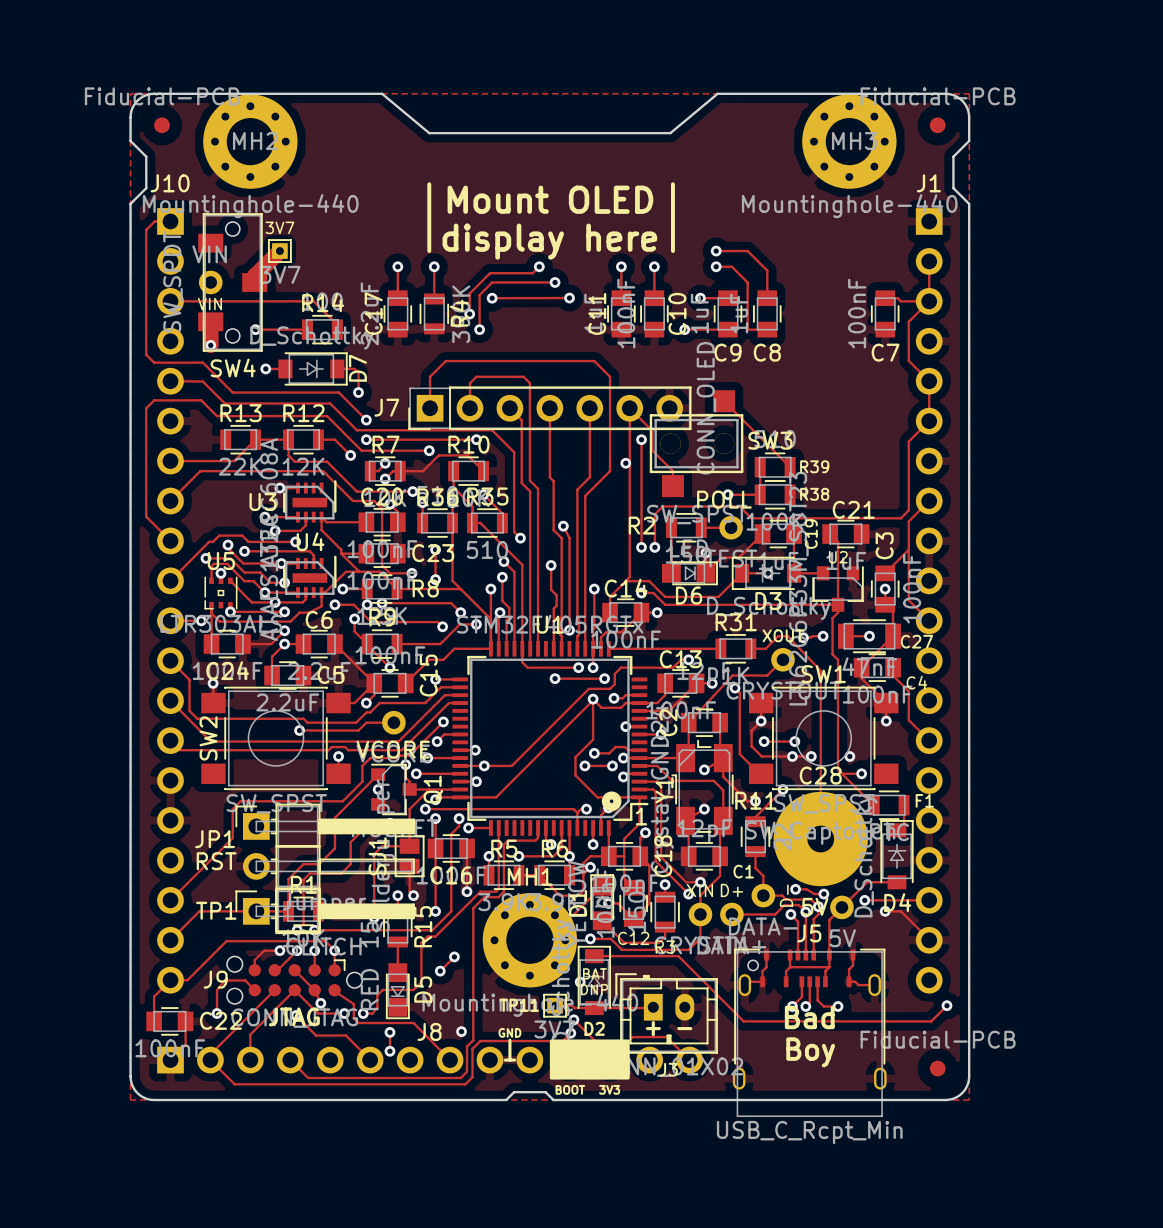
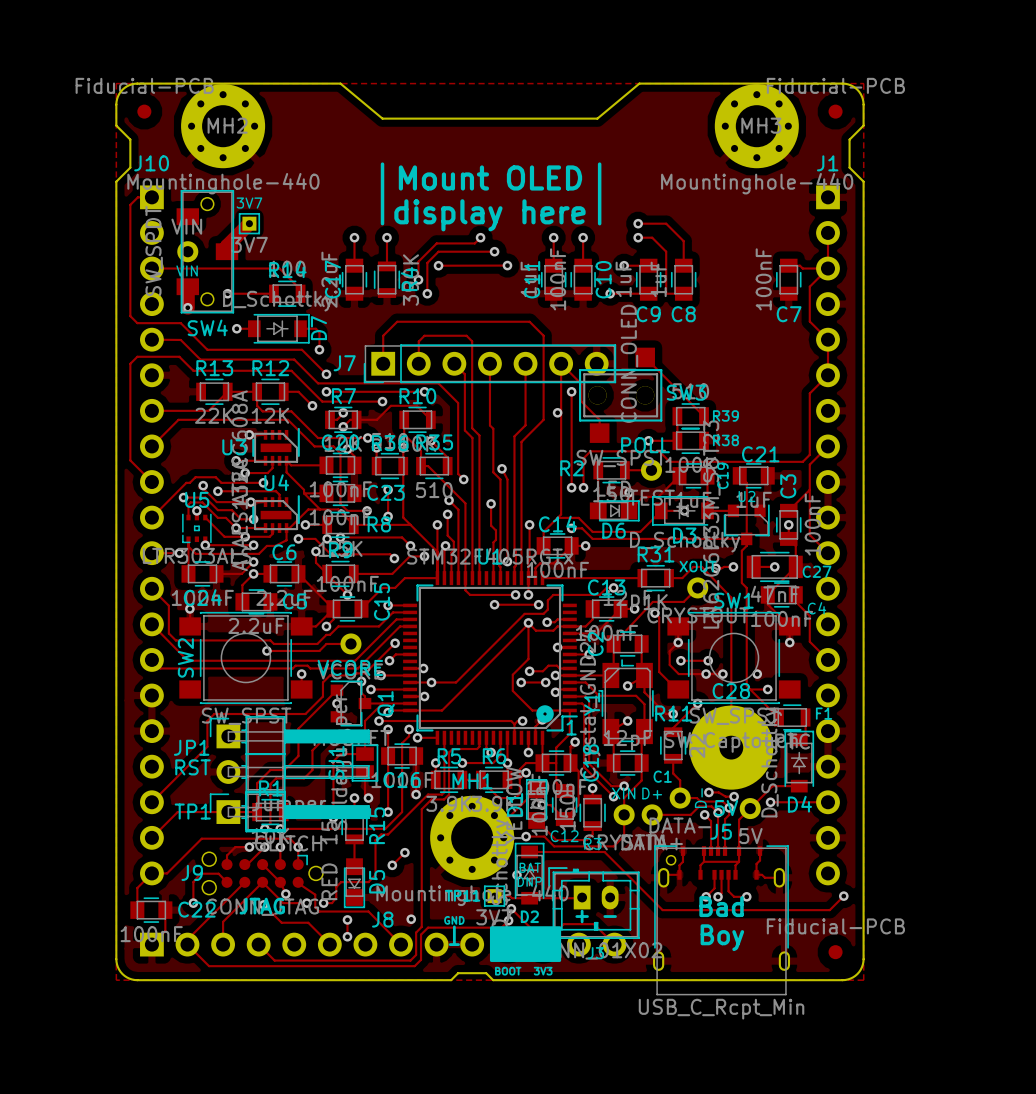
track: (885, 911) (900, 911) (929, 939) -> none
via: (885, 911) -> none

